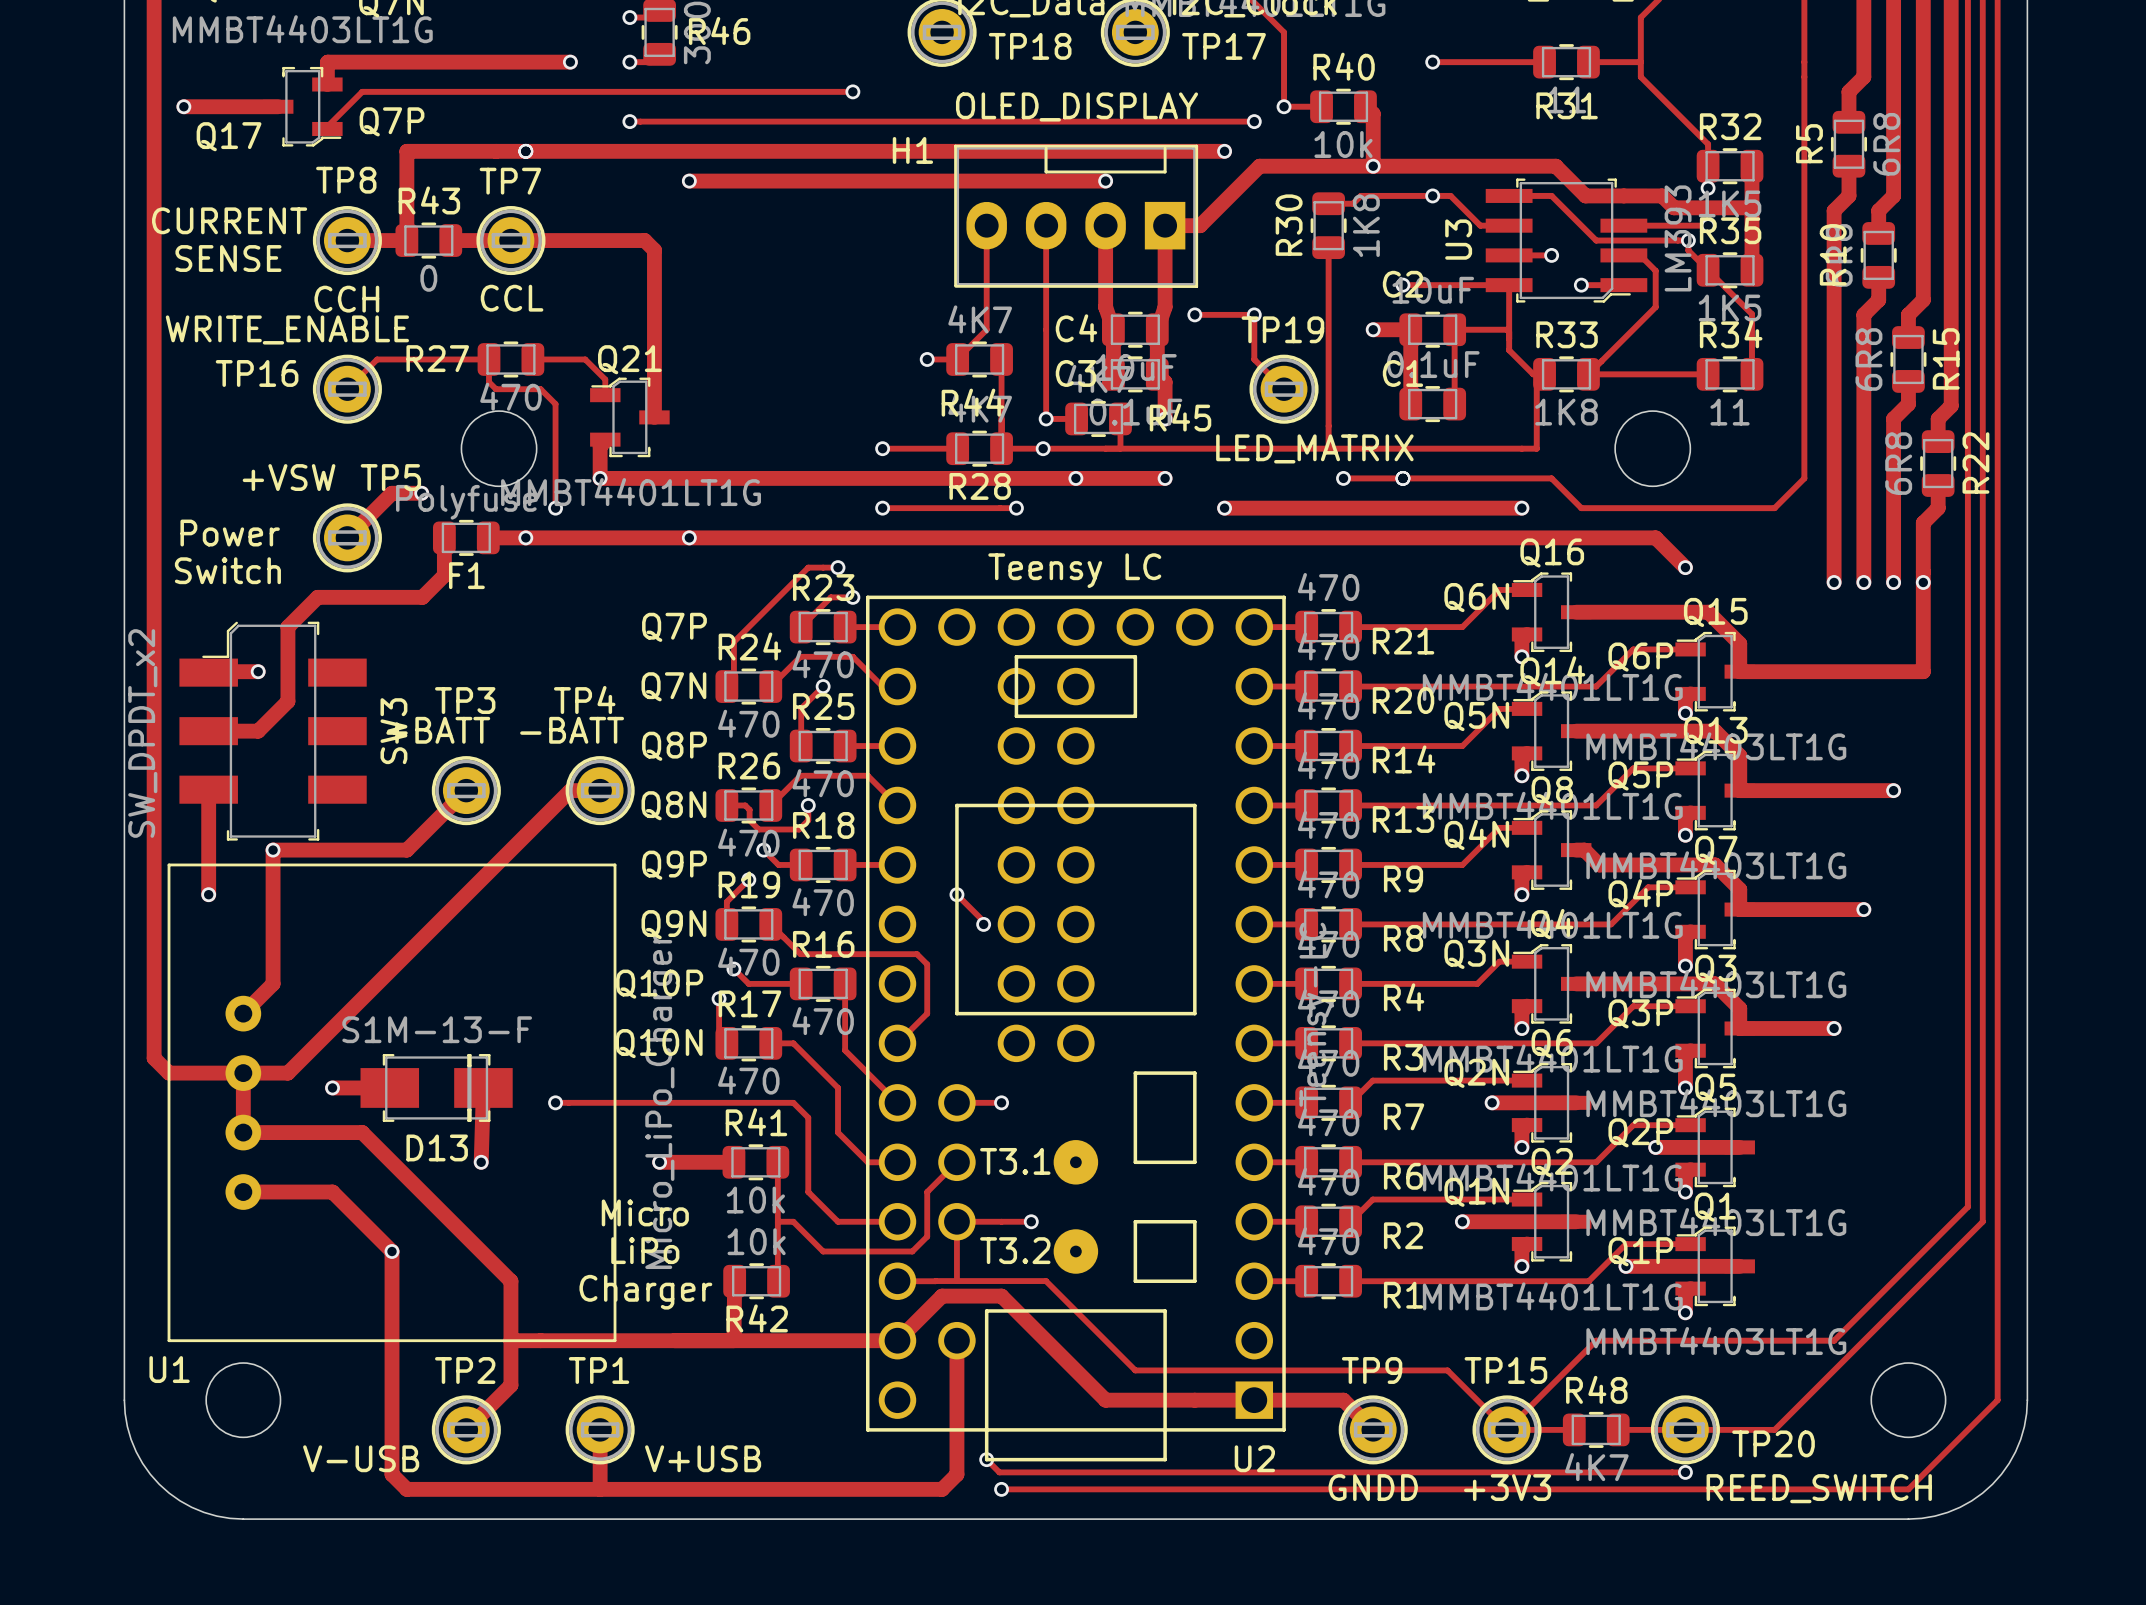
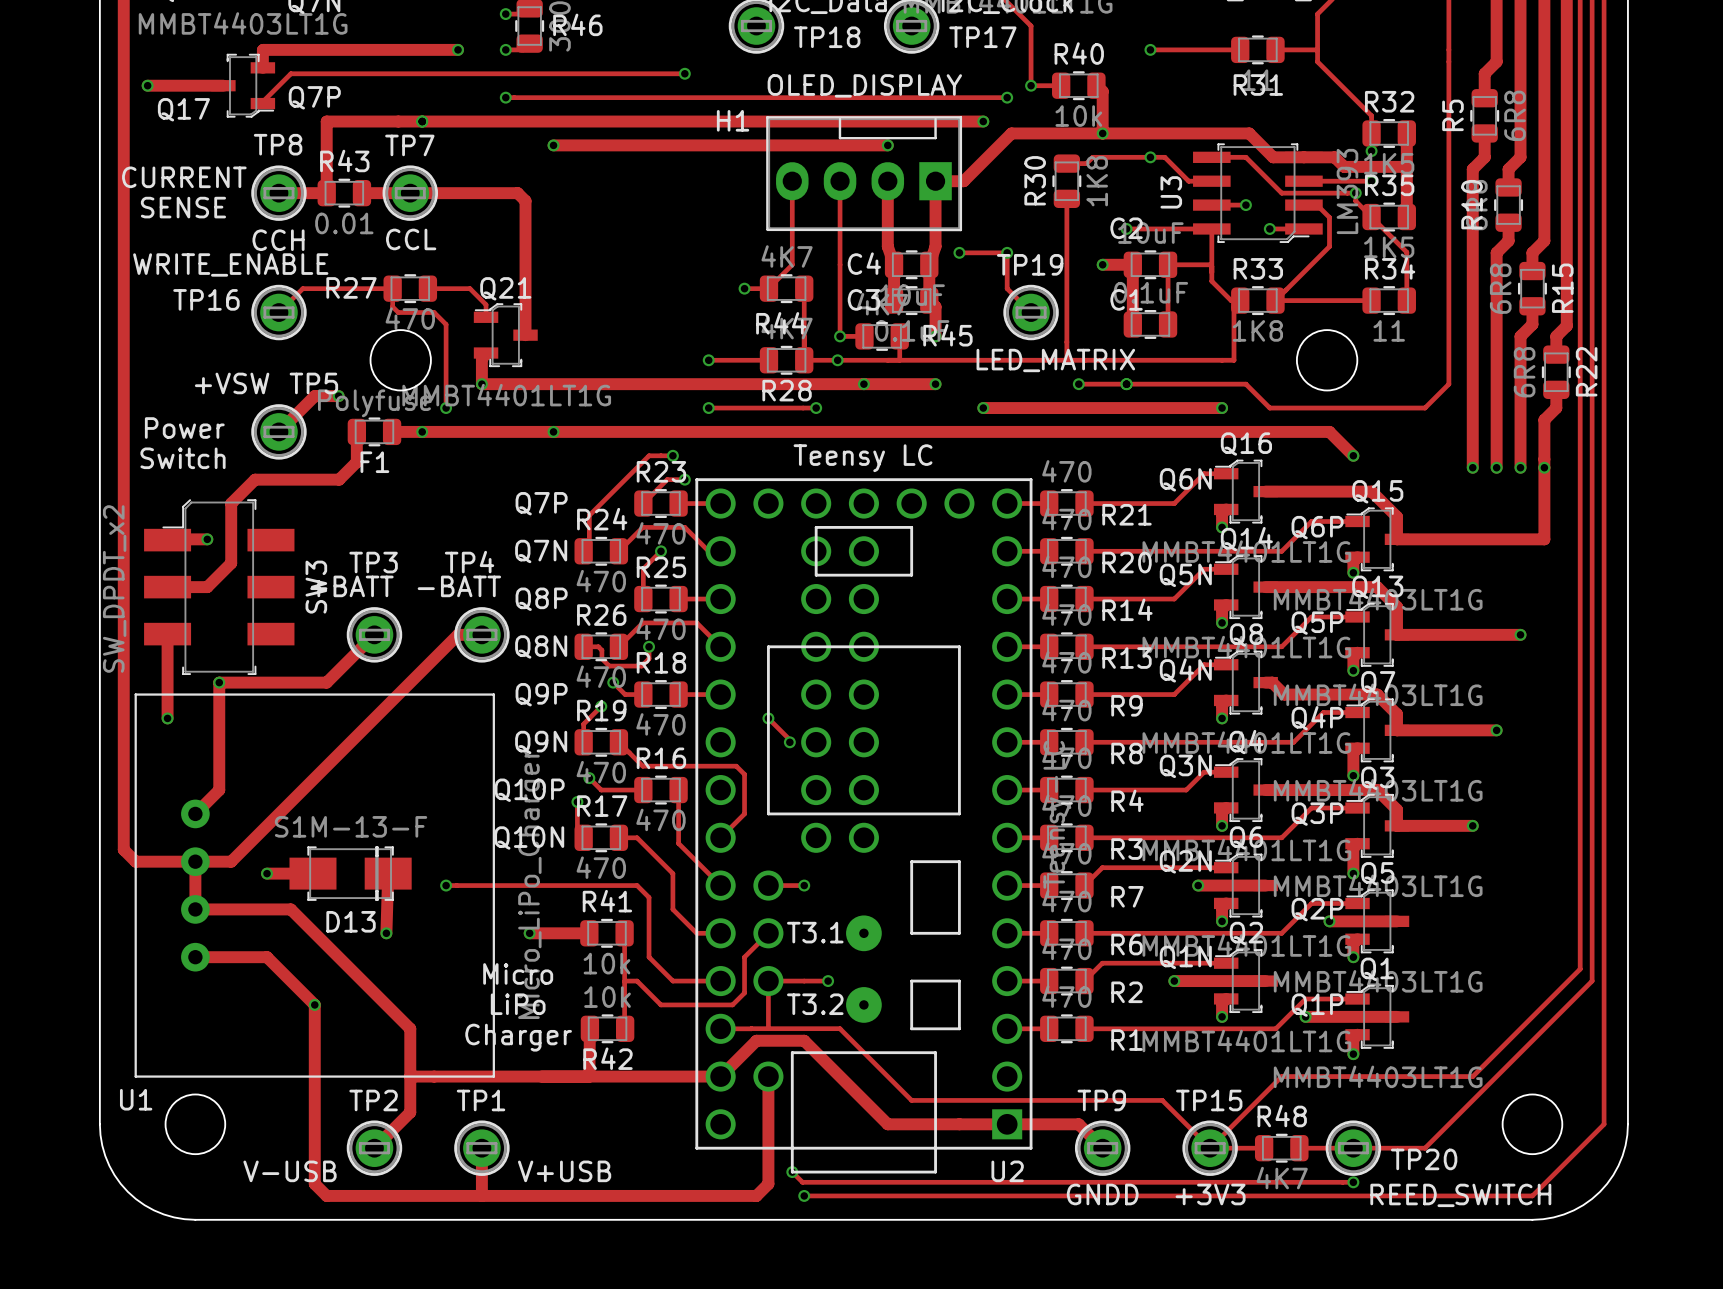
R43 value: 0 (428, 278) -> 0.01 (344, 223)

